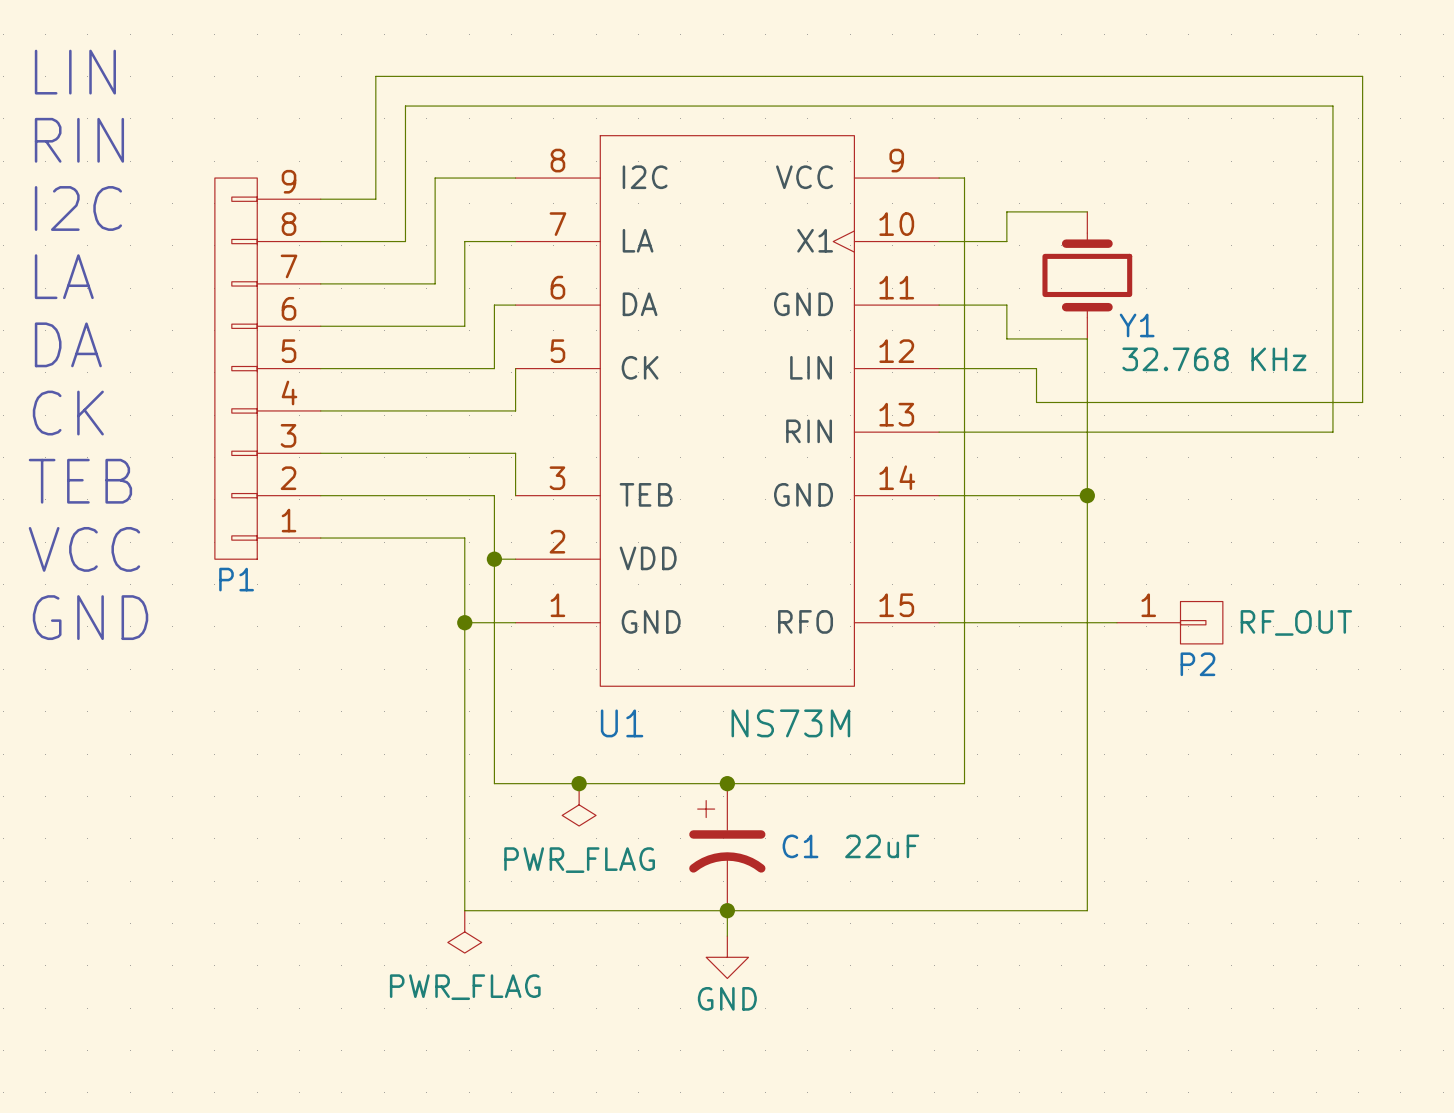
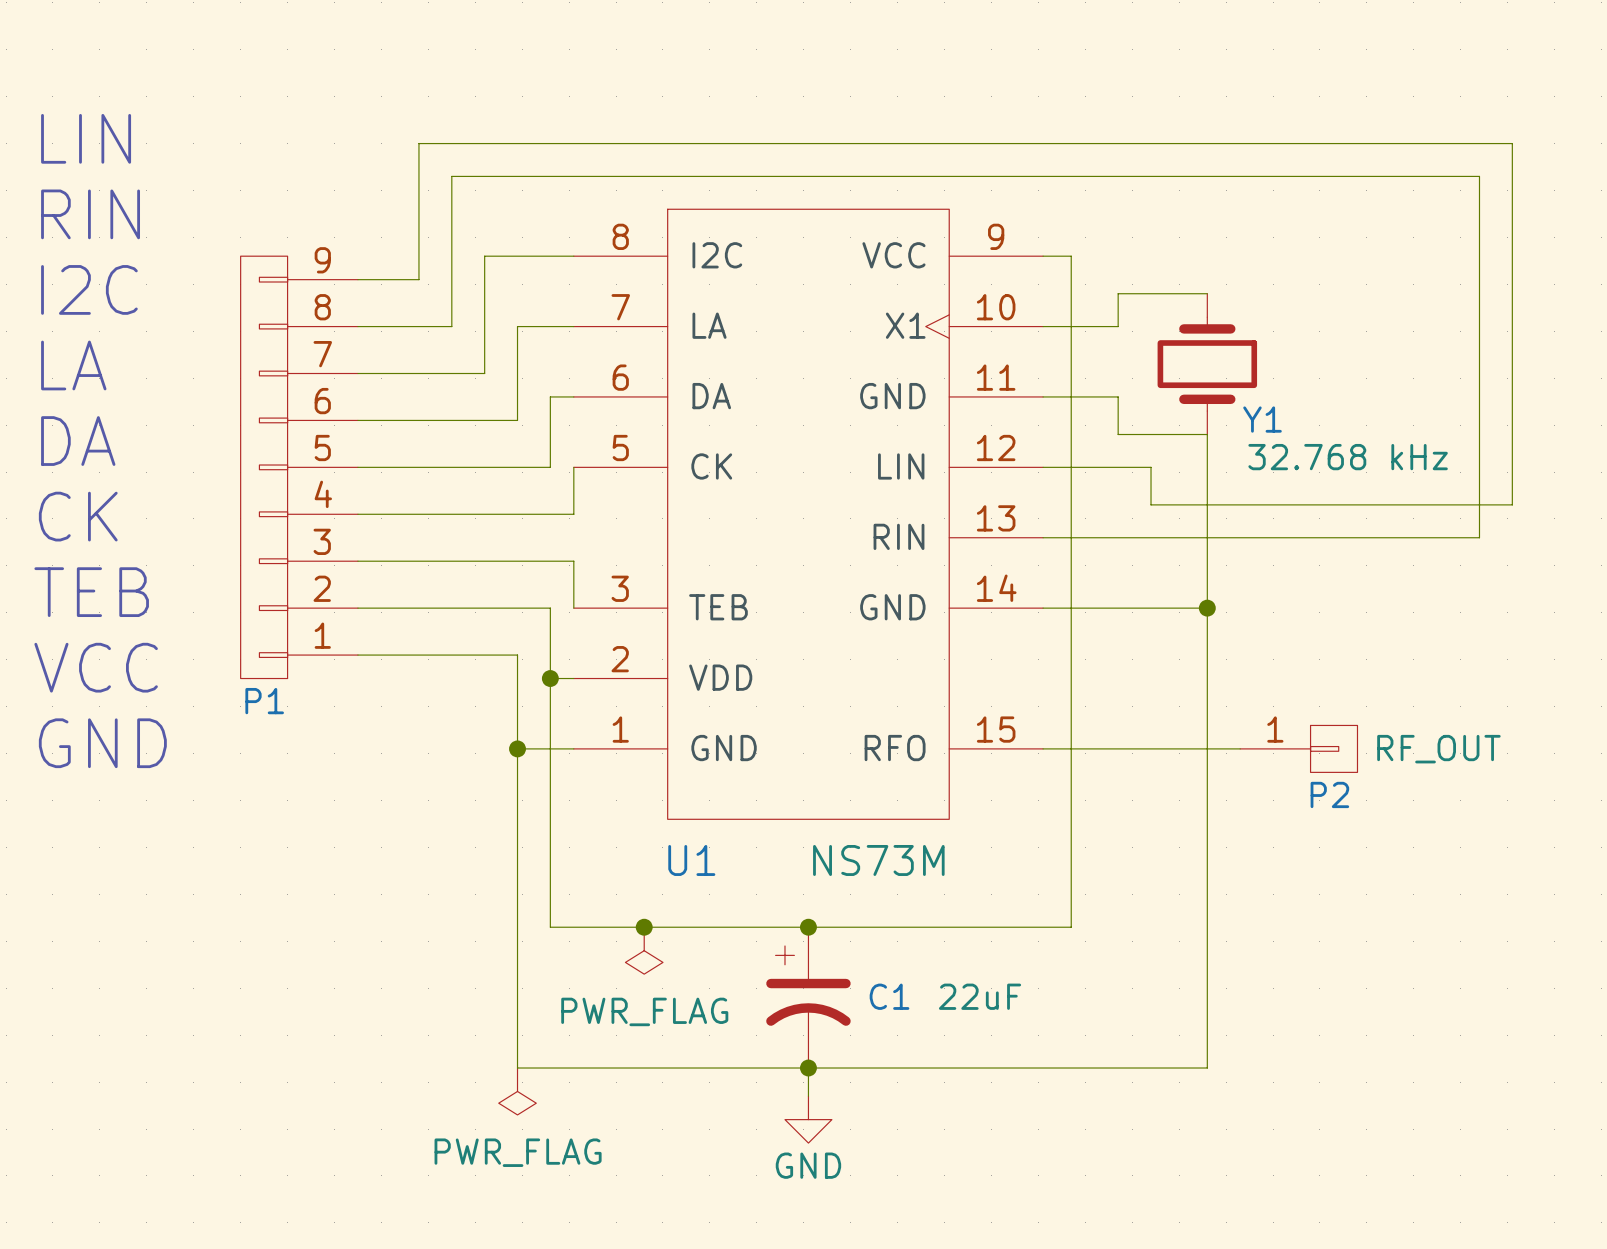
Y1 value: 32.768 KHz (1214, 359) -> 32.768 kHz (1348, 457)

